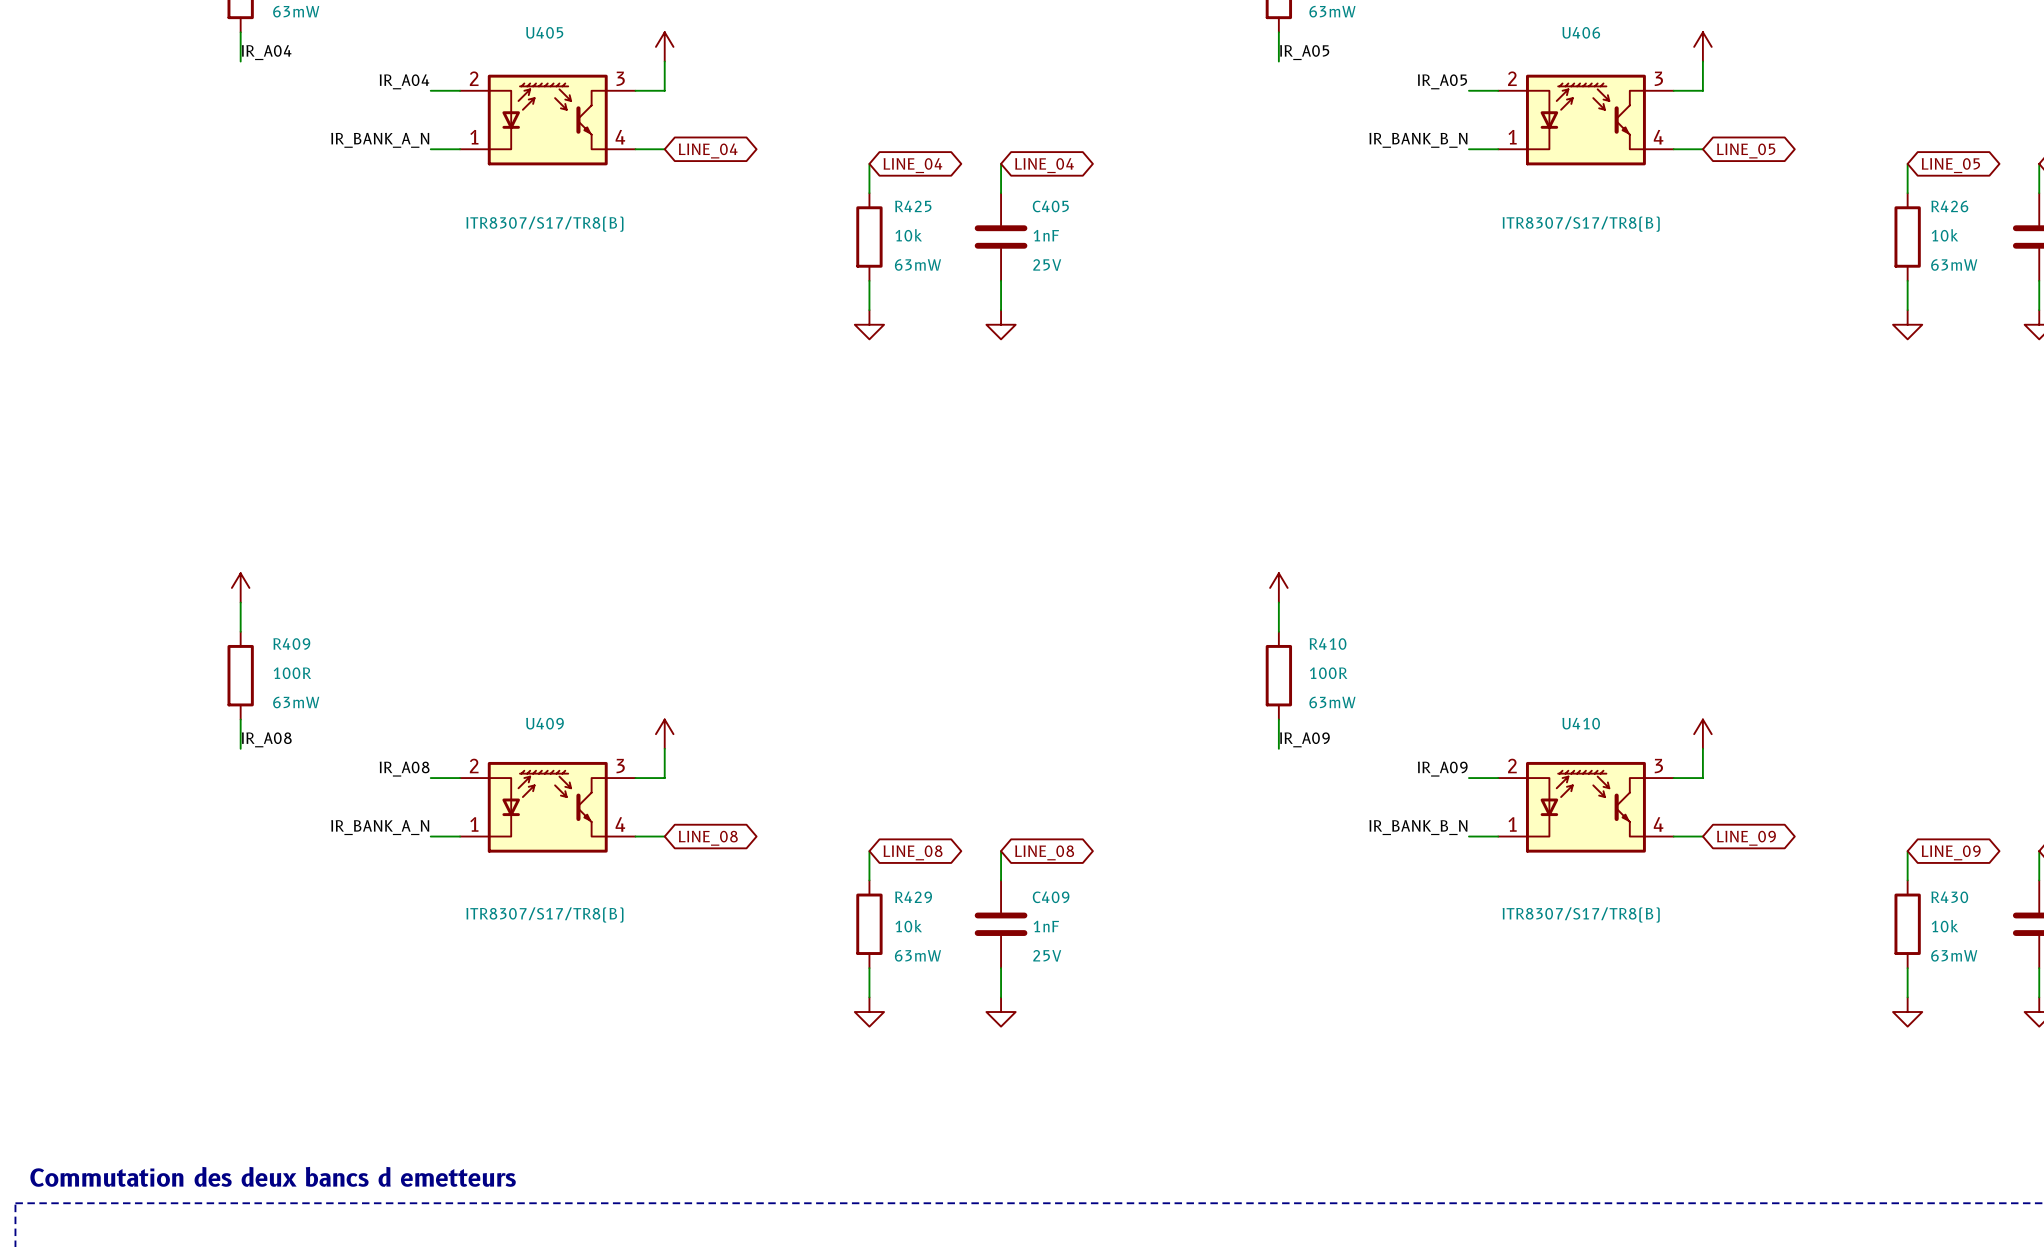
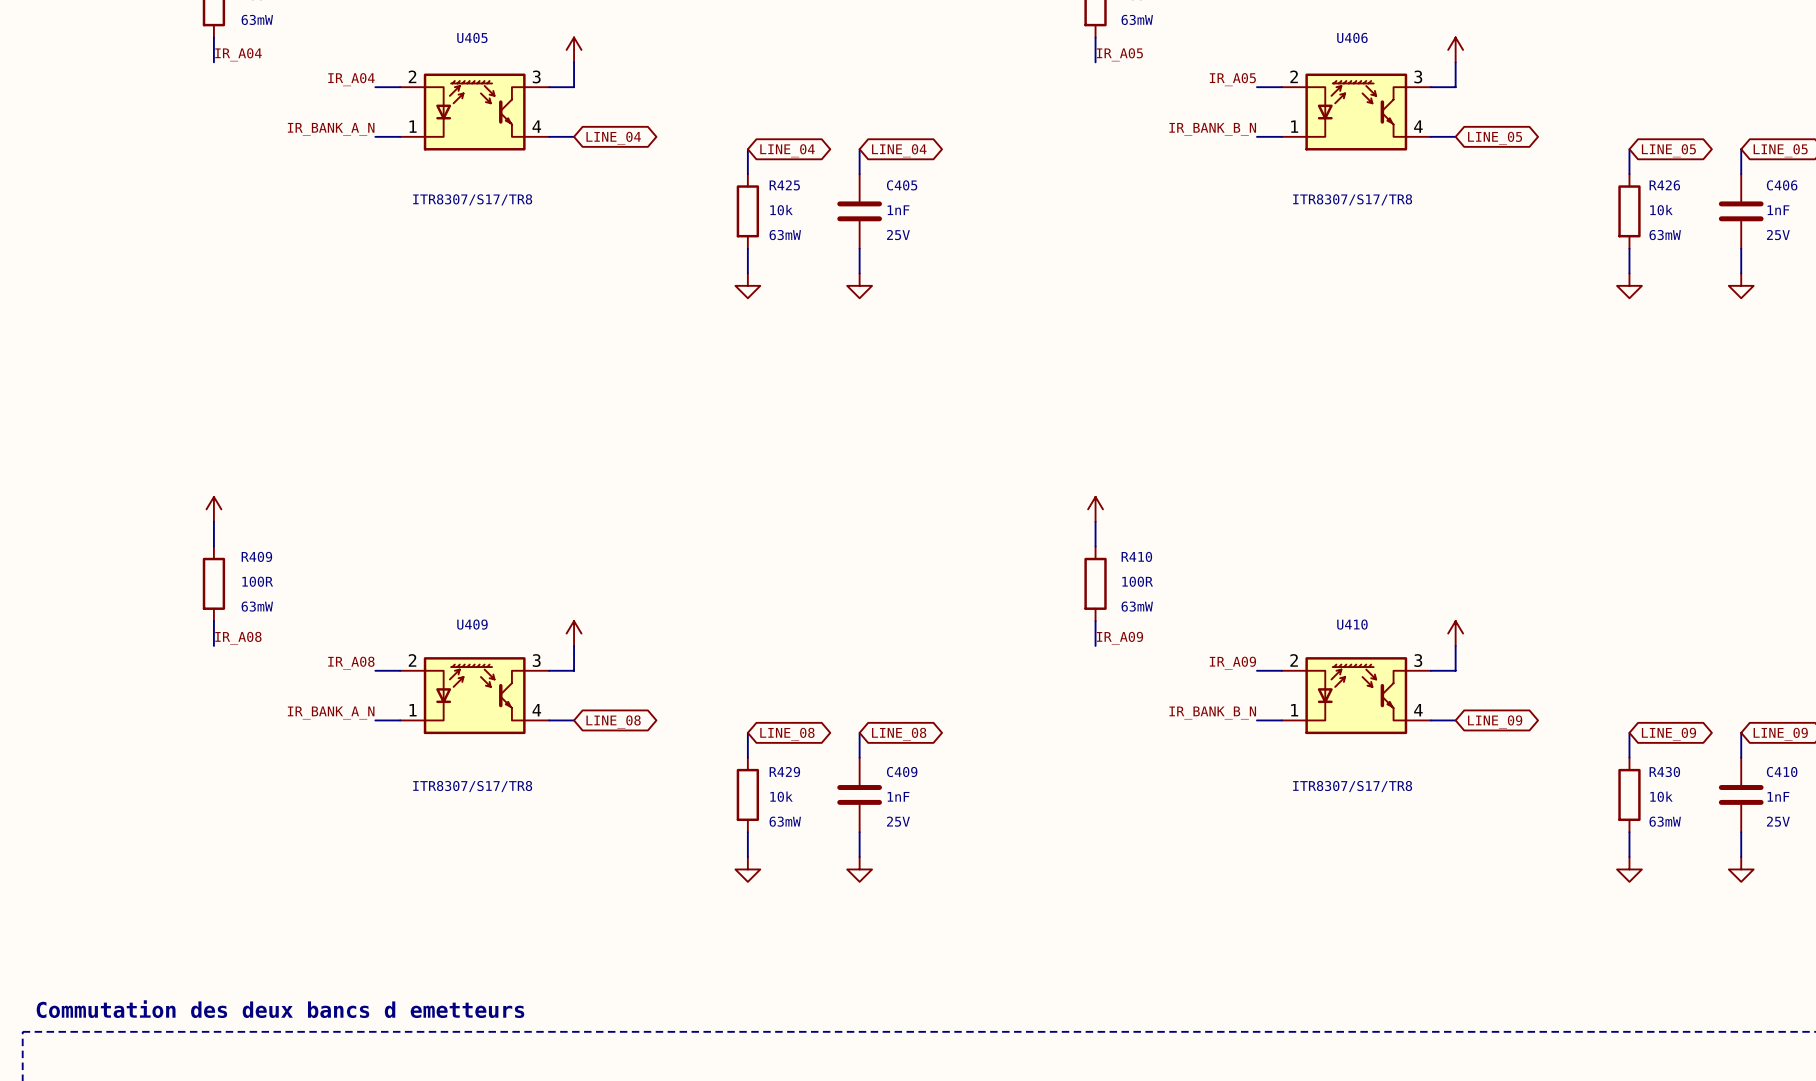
U405 value: ITR8307/S17/TR8(B) (544, 224) -> ITR8307/S17/TR8 (472, 199)
U406 value: ITR8307/S17/TR8(B) (1581, 224) -> ITR8307/S17/TR8 (1352, 199)
U409 value: ITR8307/S17/TR8(B) (544, 914) -> ITR8307/S17/TR8 (472, 786)
U410 value: ITR8307/S17/TR8(B) (1581, 914) -> ITR8307/S17/TR8 (1352, 786)

